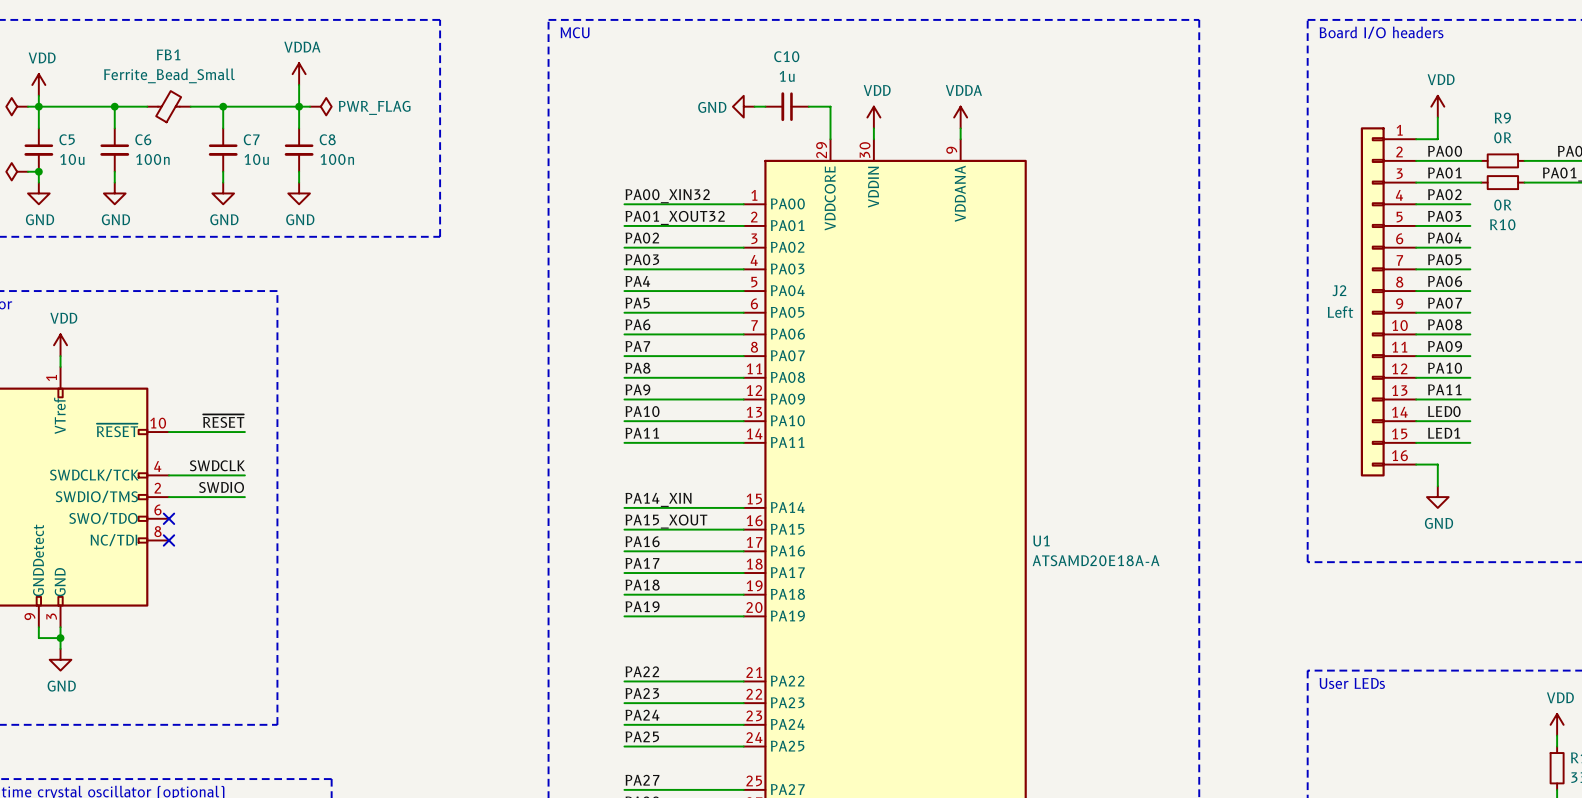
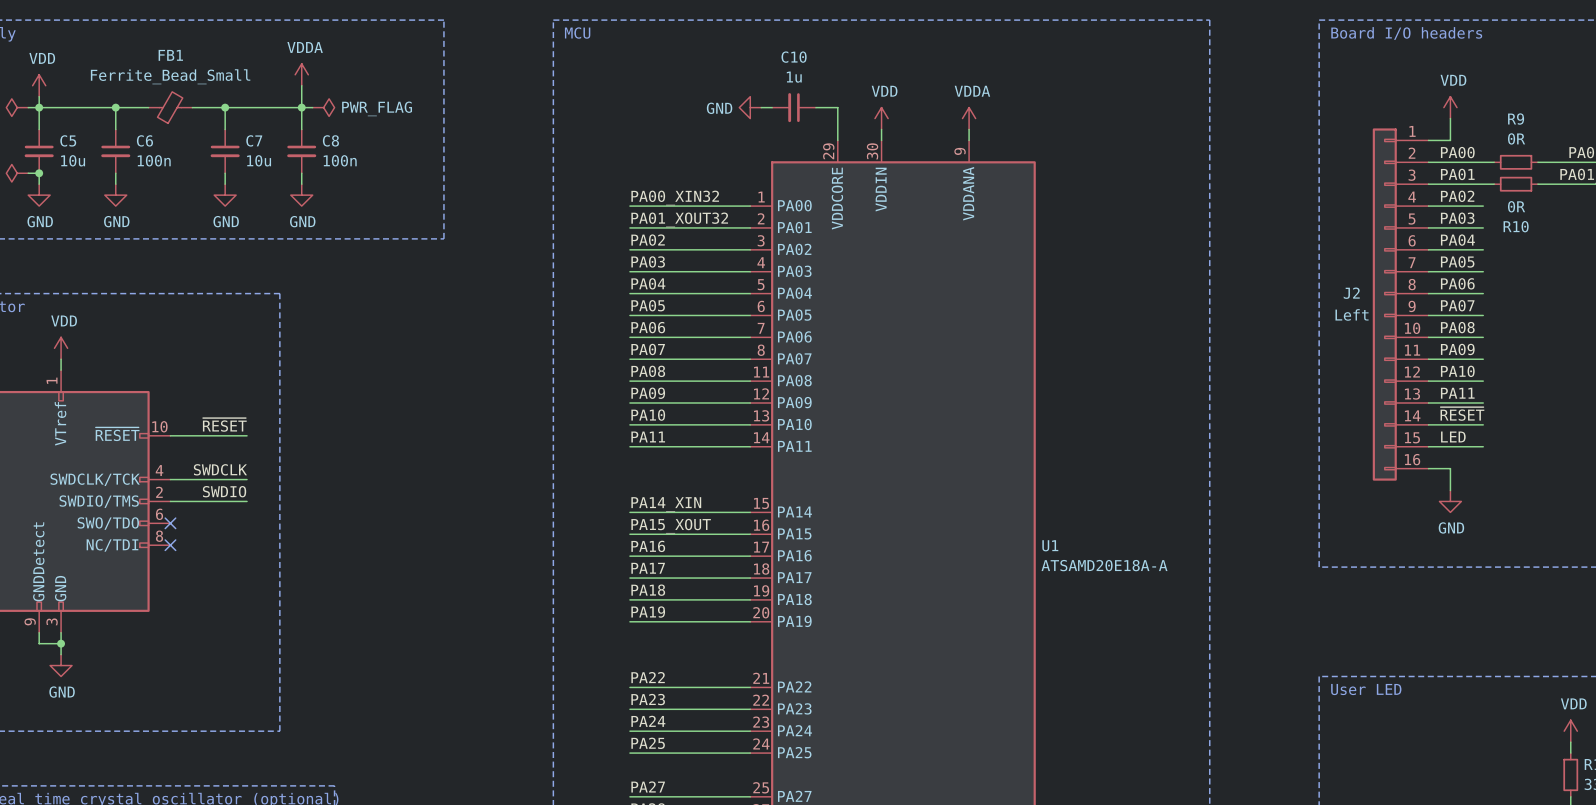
label: PA4 (637, 281) -> PA04 (648, 283)
label: PA5 (637, 303) -> PA05 (648, 305)
label: PA6 (637, 324) -> PA06 (648, 327)
label: PA7 (637, 346) -> PA07 (648, 349)
label: PA8 (637, 368) -> PA08 (648, 371)
label: PA9 (637, 389) -> PA09 (648, 393)
label: LED0 (1444, 411) -> ~{RESET} (1462, 413)
label: LED1 (1444, 433) -> LED (1453, 436)
text: User LEDs (1352, 683) -> User LED (1366, 689)

